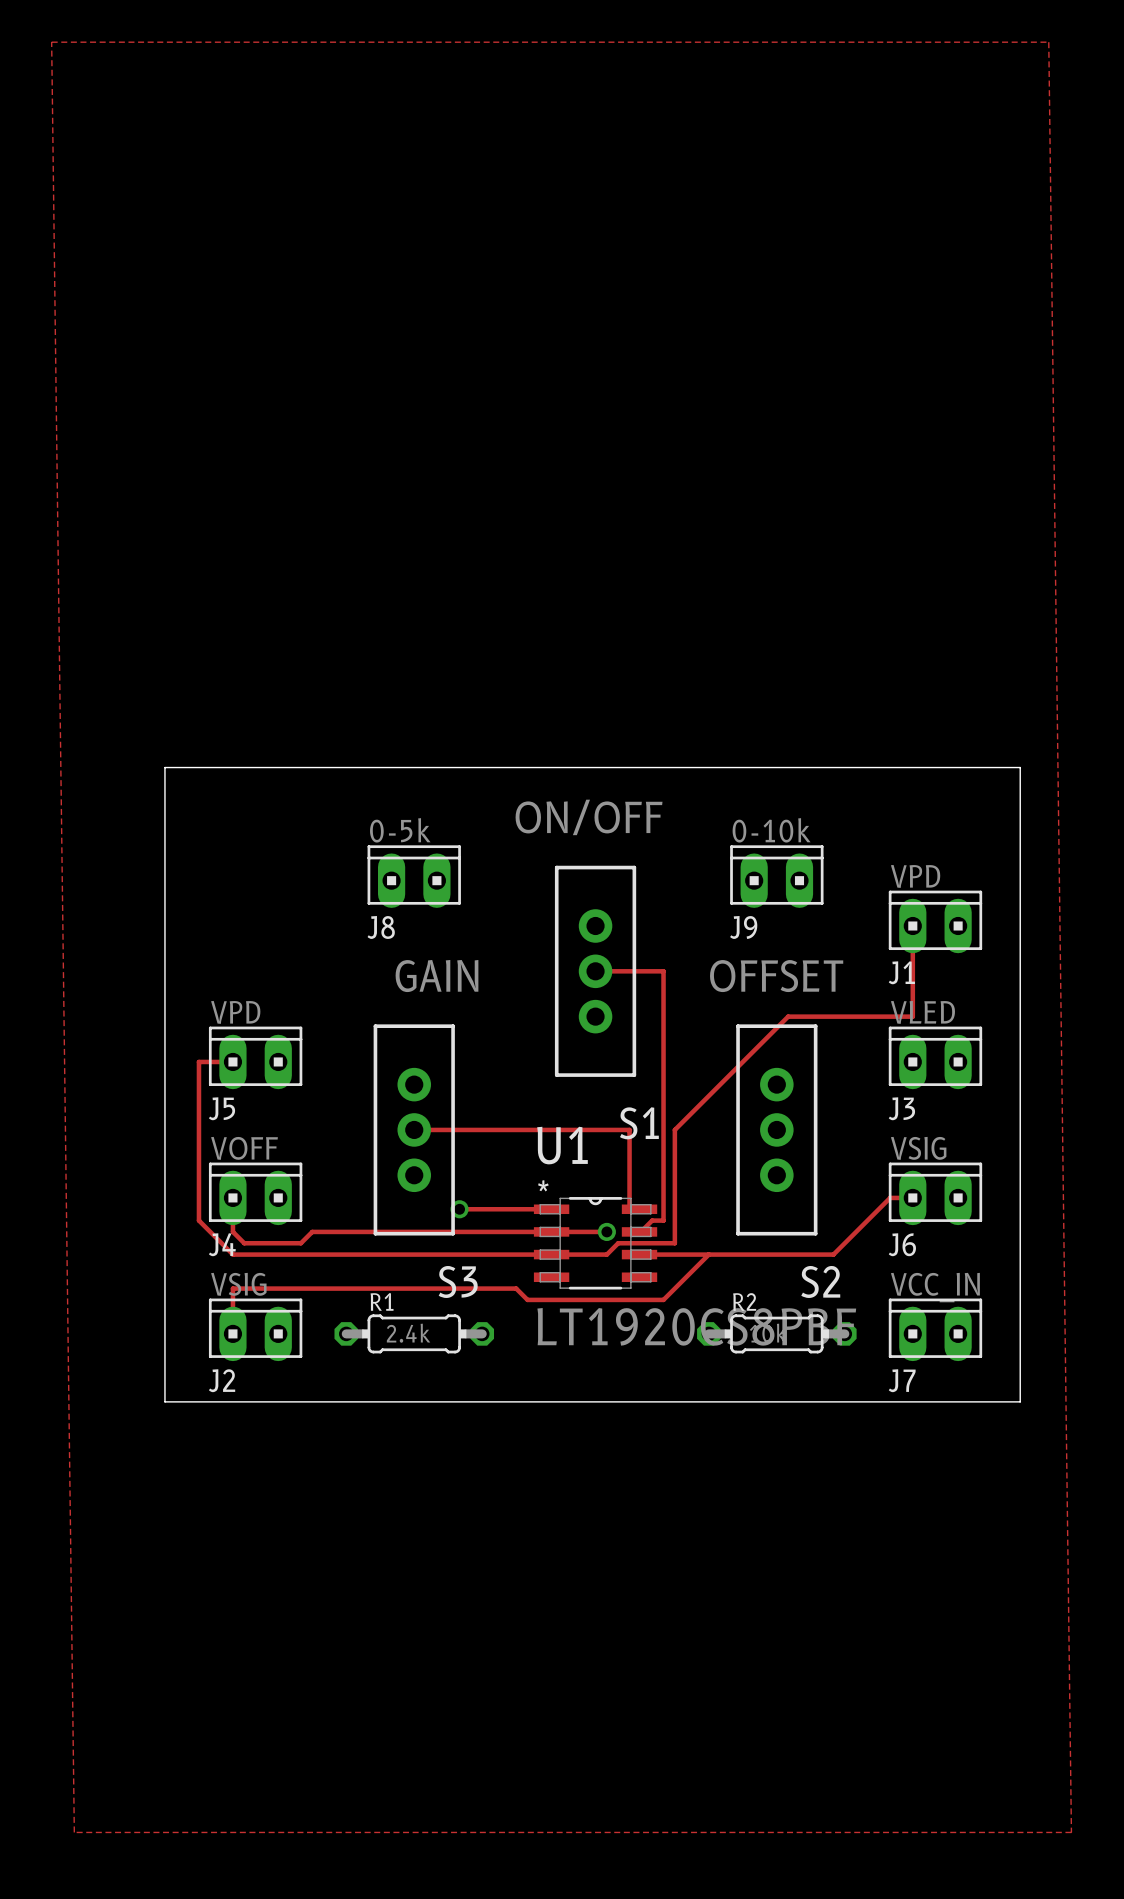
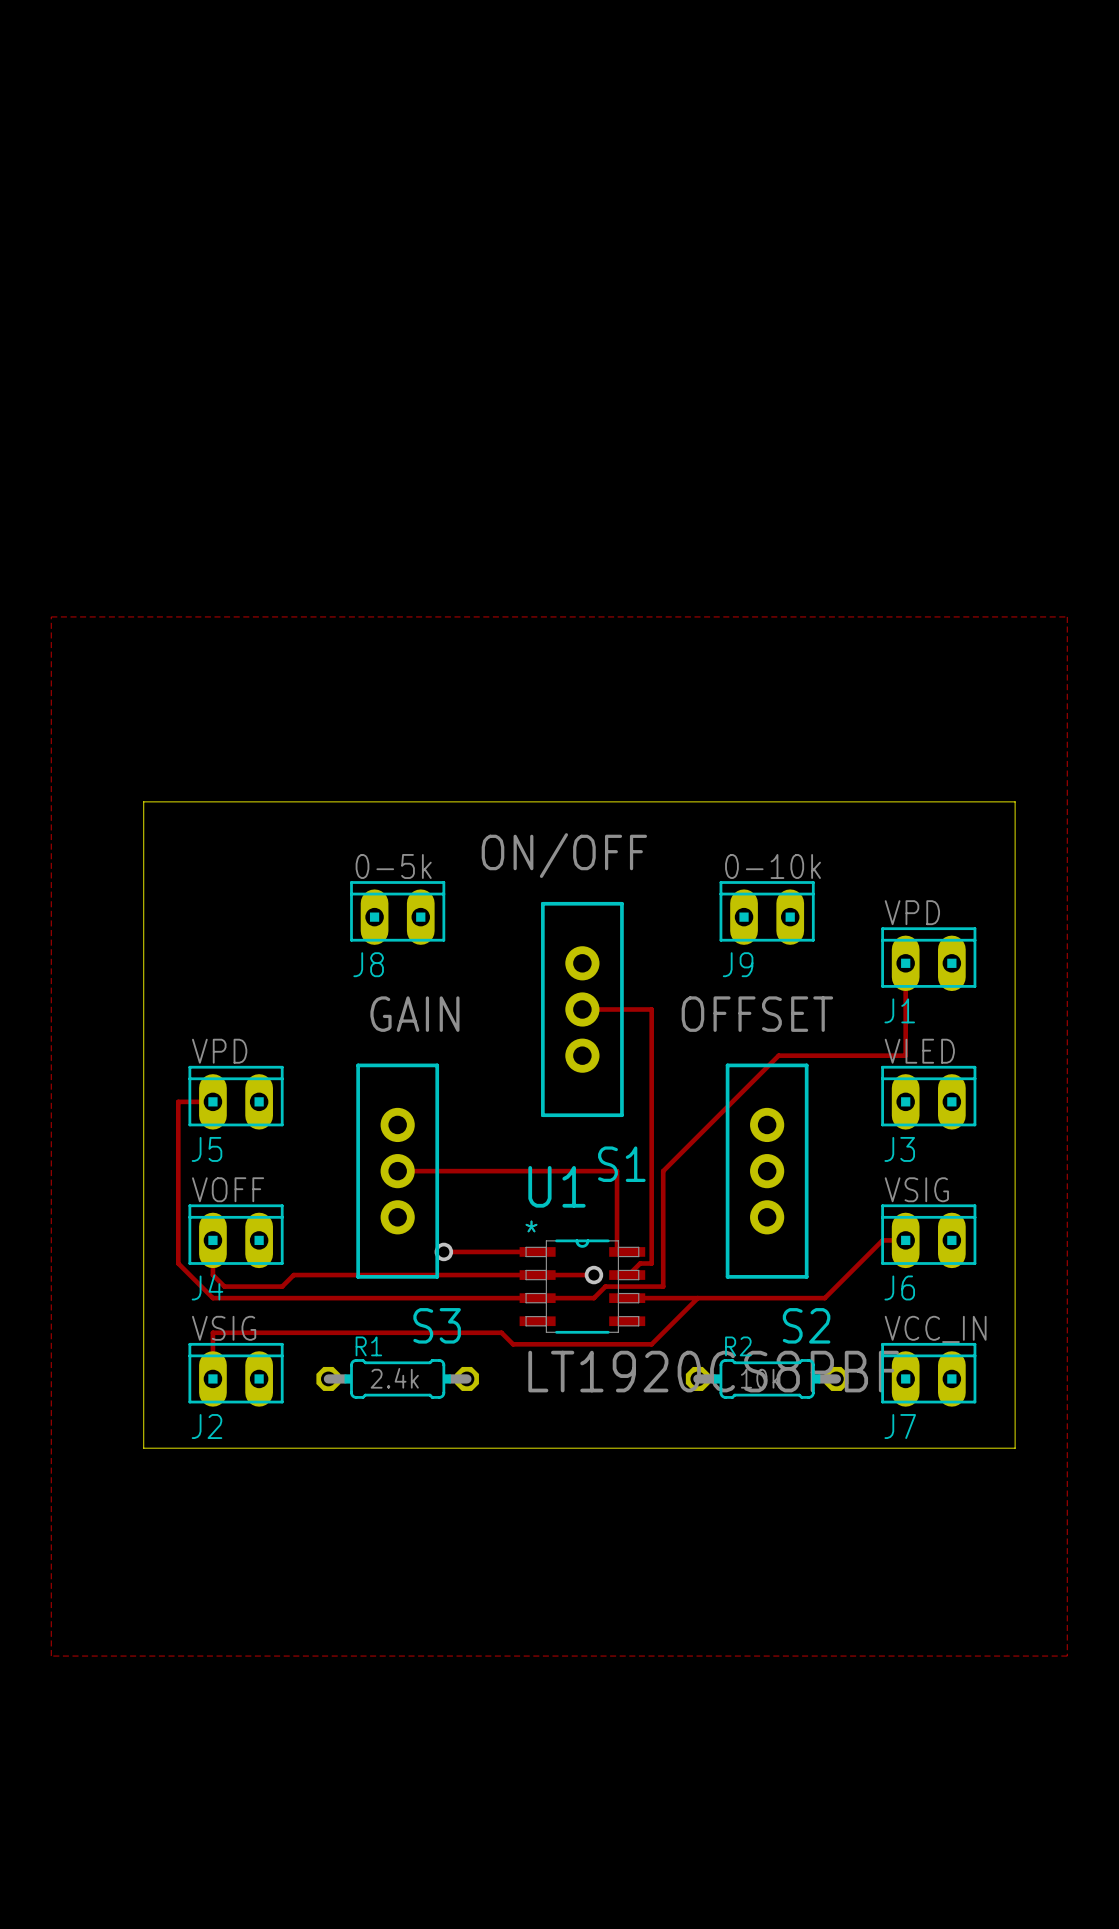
zone outline: (51, 42) (1048, 42) (1071, 1832) (74, 1832) (51, 42) -> (51, 616) (51, 1656) (1067, 1656) (1067, 616) (51, 616)

